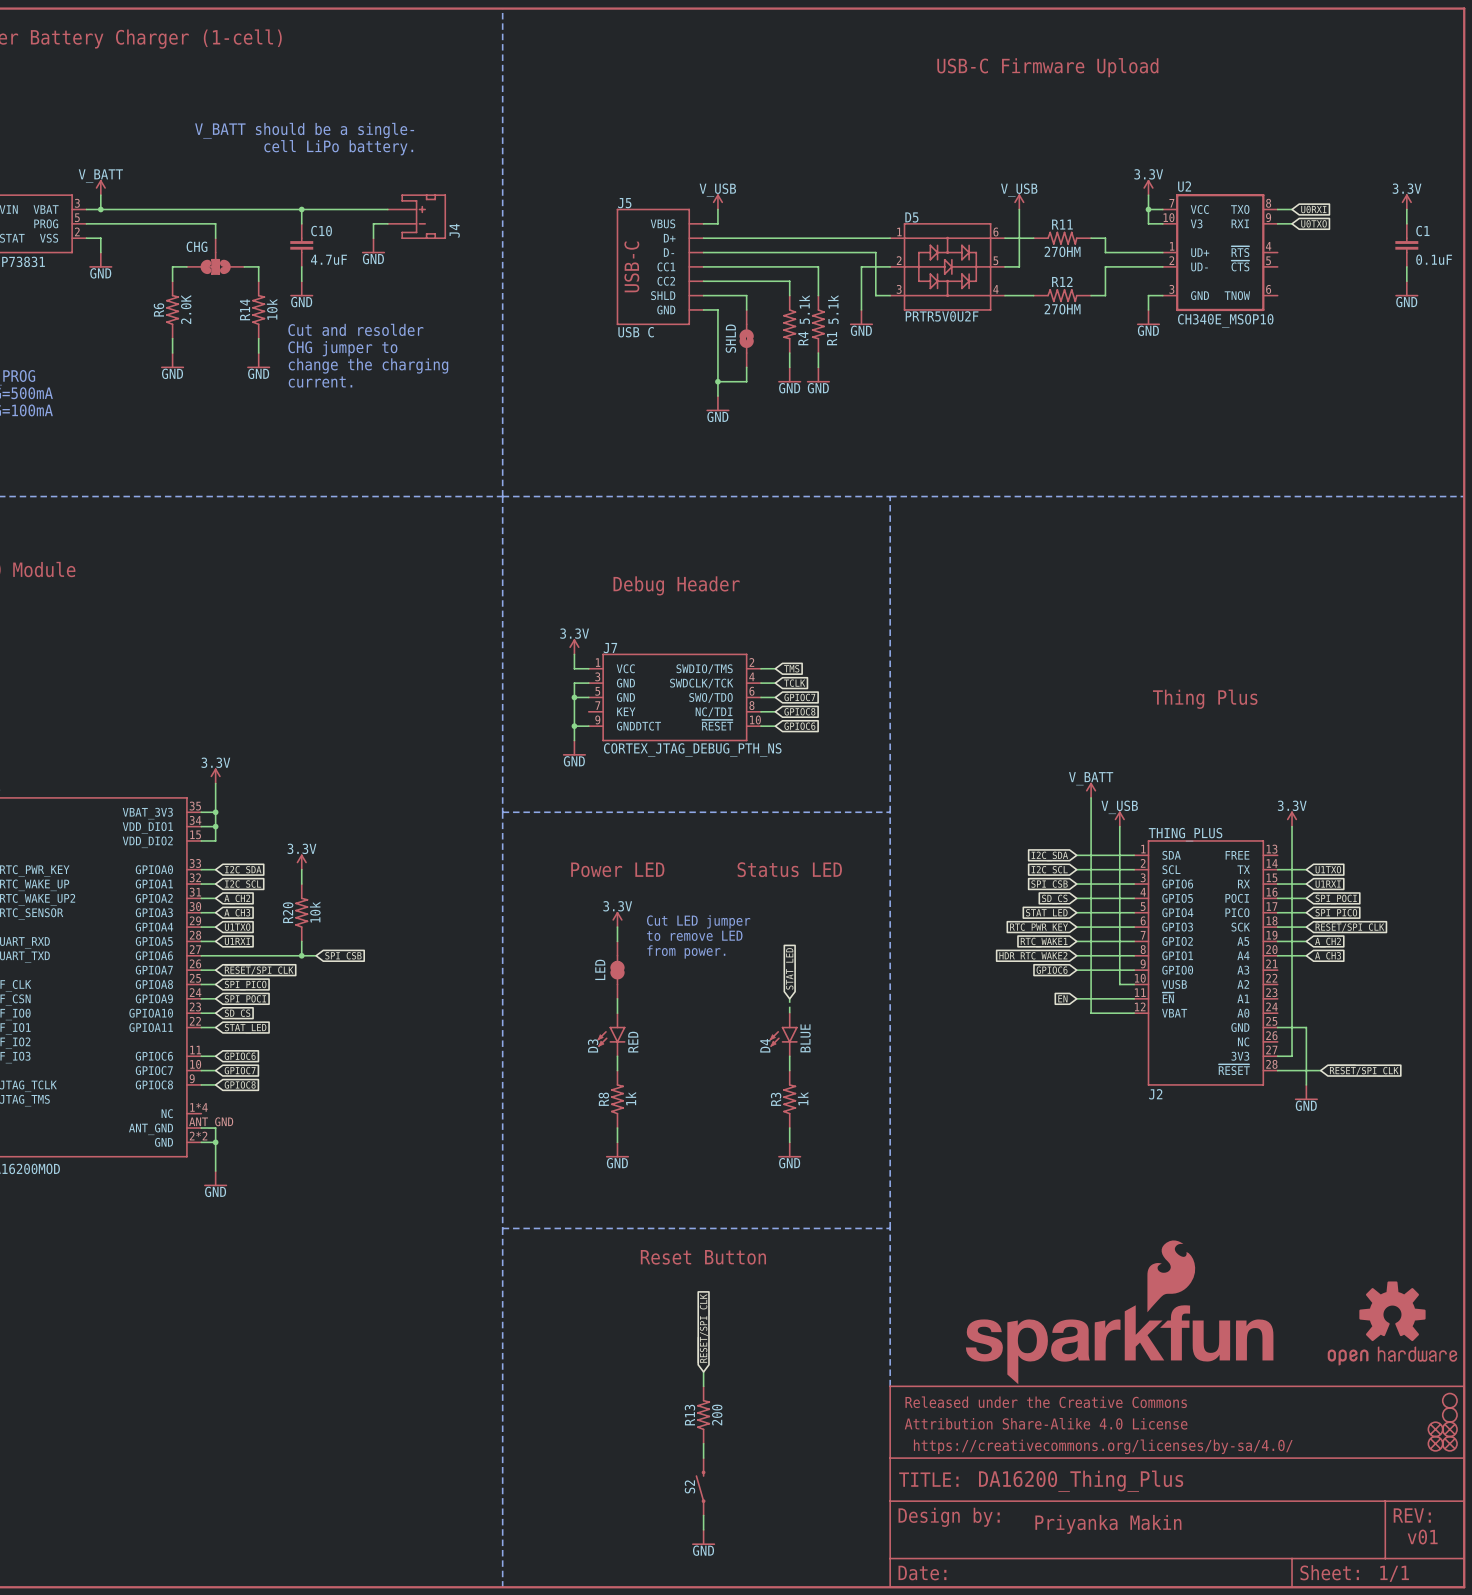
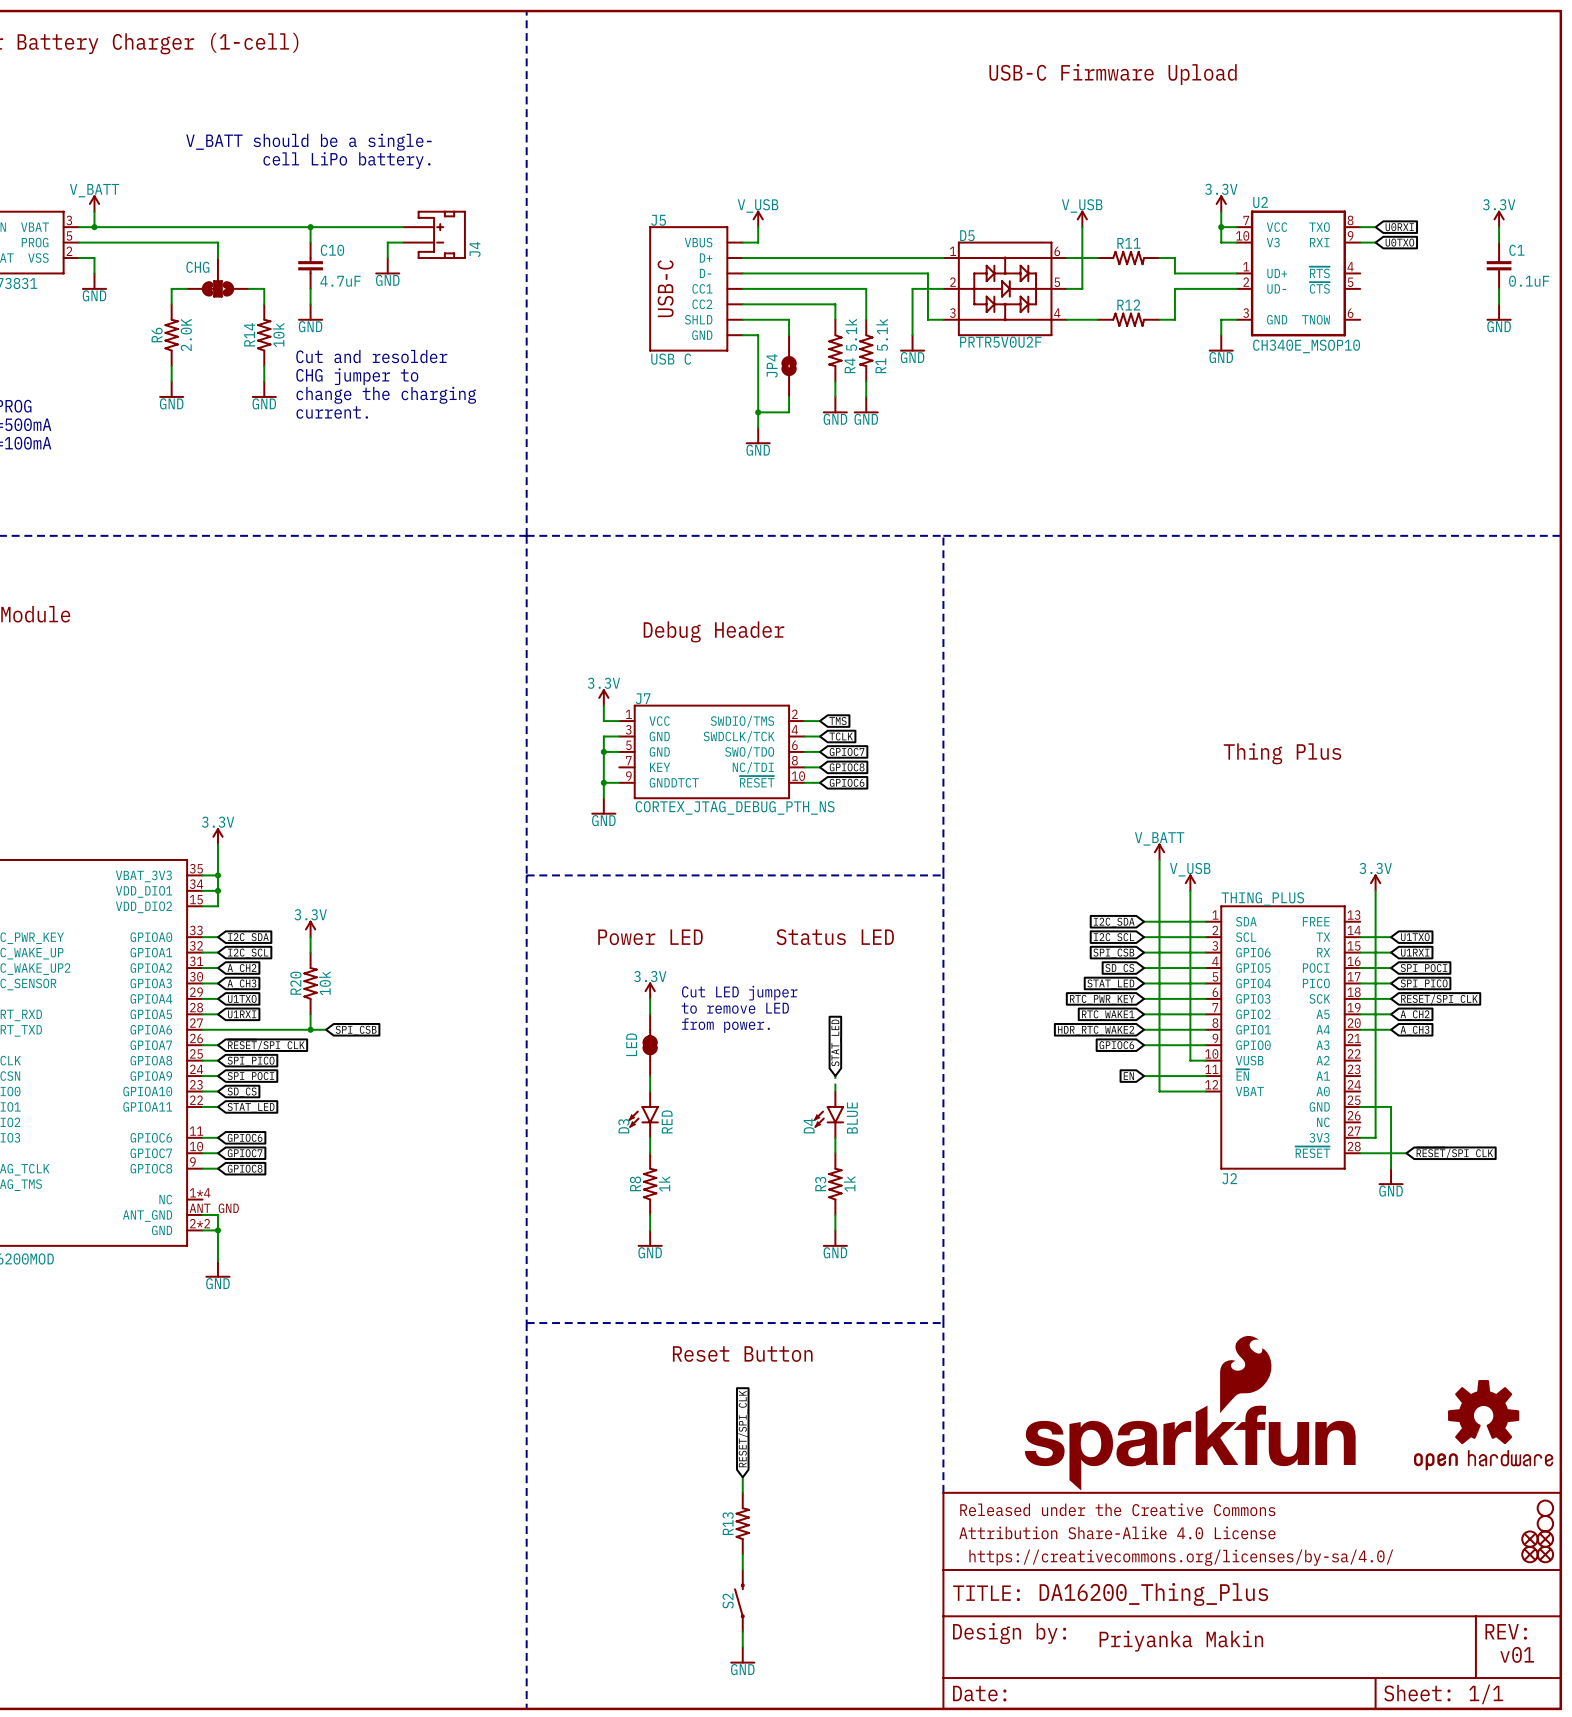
R11 value: 27OHM (1062, 251) -> none
R12 value: 27OHM (1062, 309) -> none
SHLD name: SHLD (730, 338) -> JP4 (772, 365)
R13 value: 200 (717, 1414) -> none

